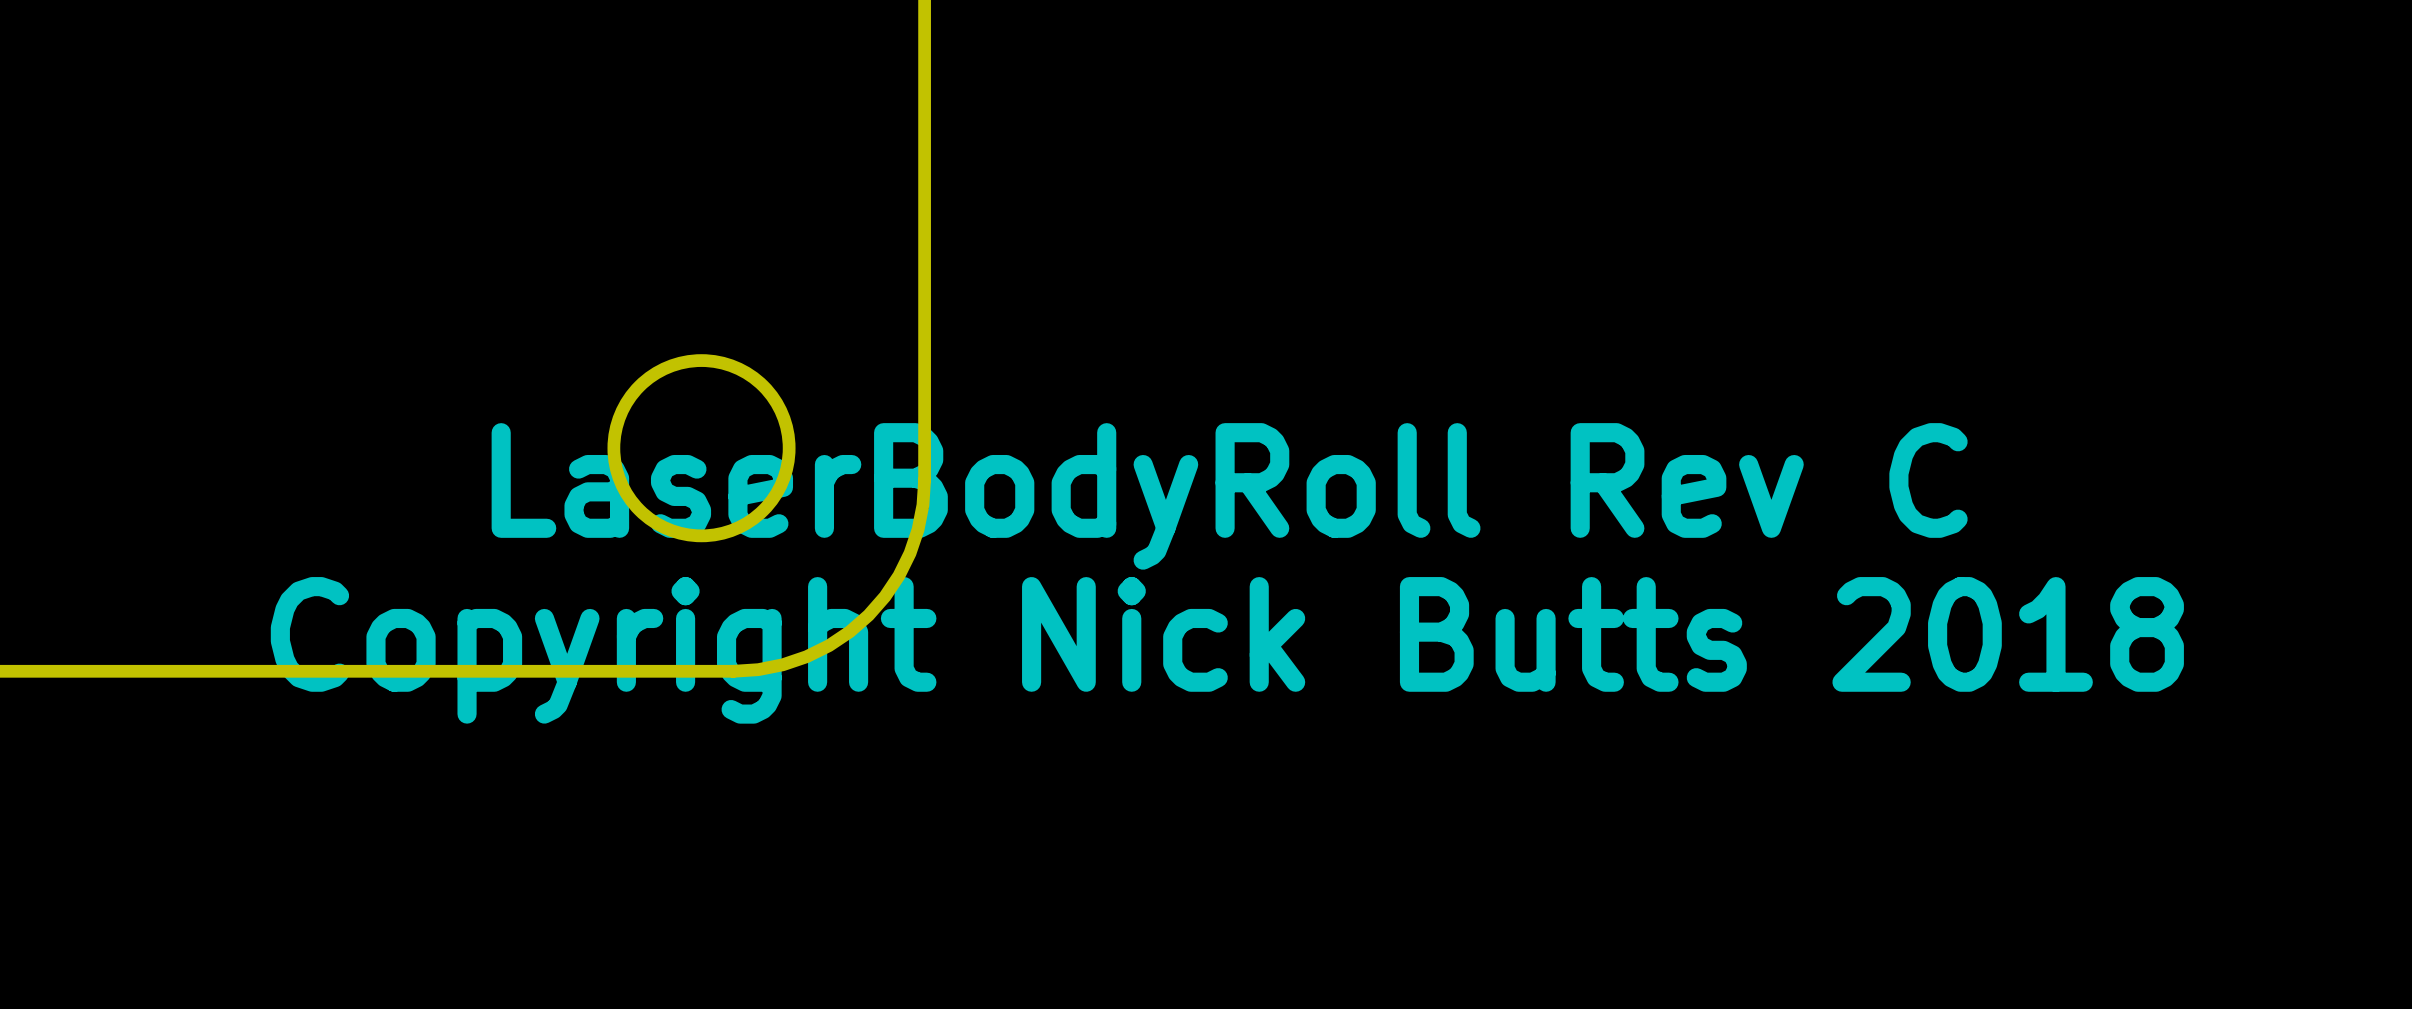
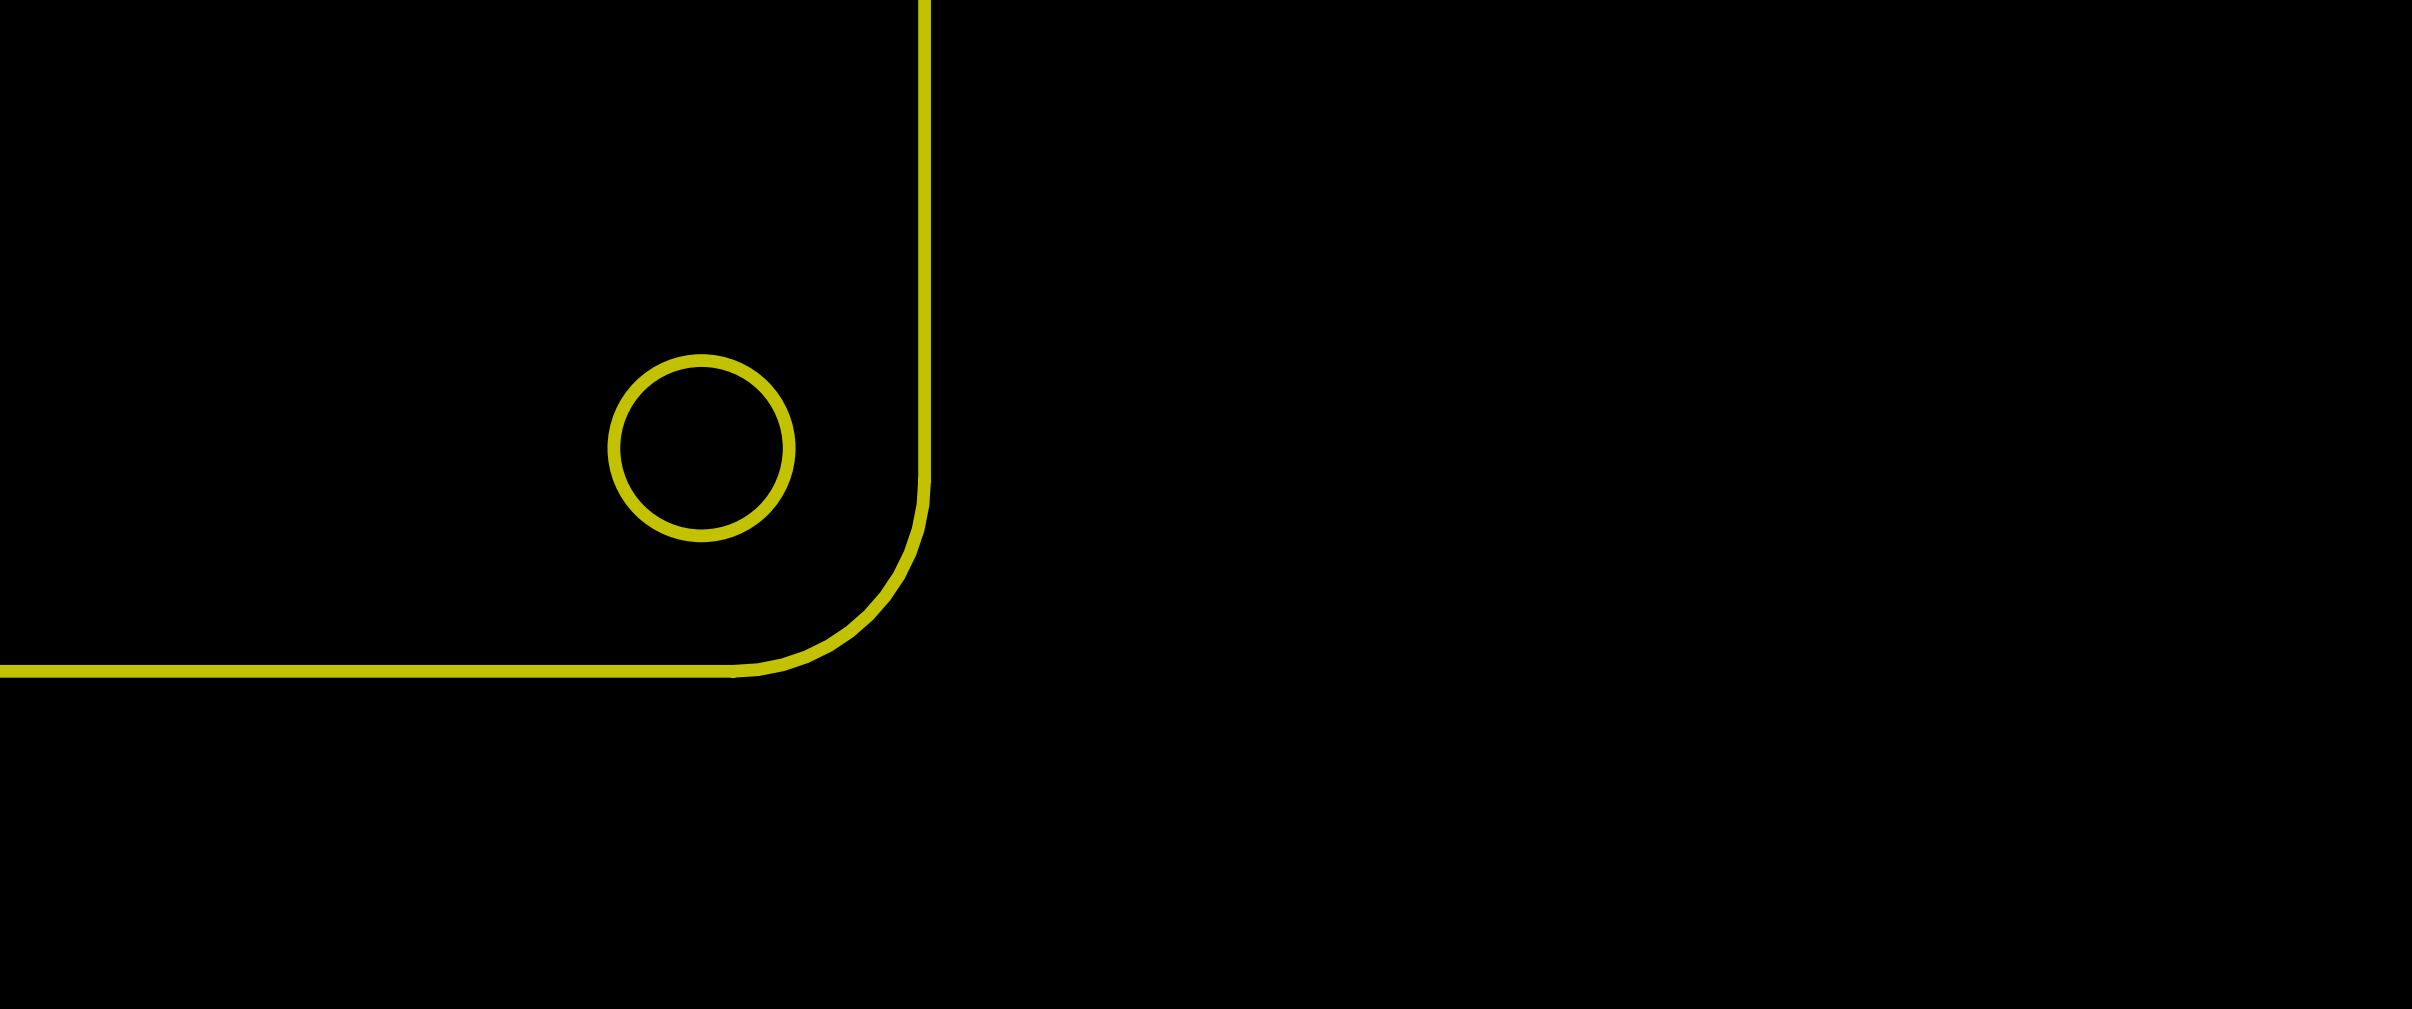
text: LaserBodyRoll Rev C (1229, 496) -> none
text: Copyright Nick Butts 2018 (1227, 650) -> none

